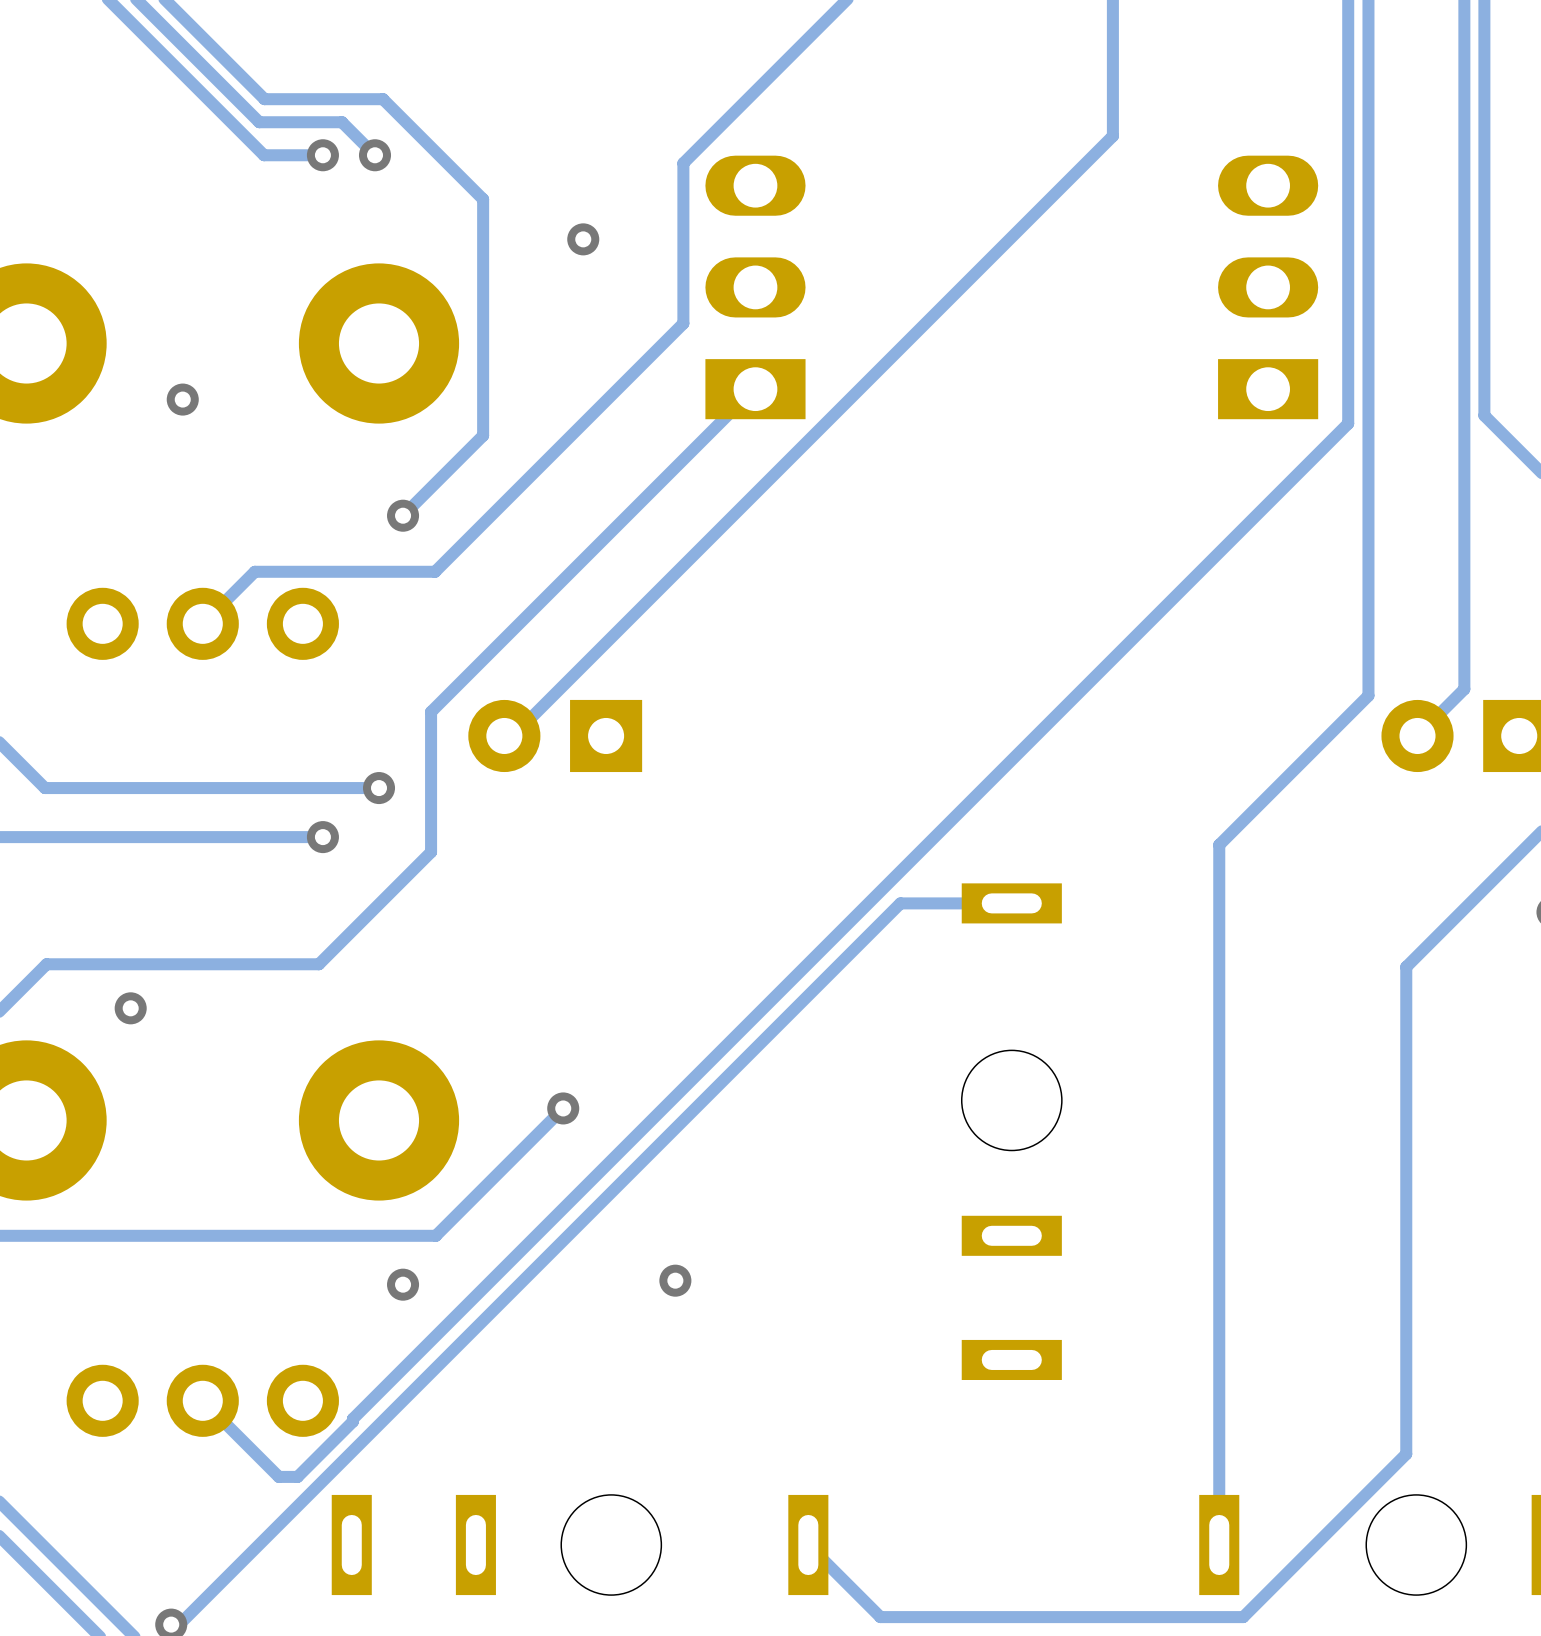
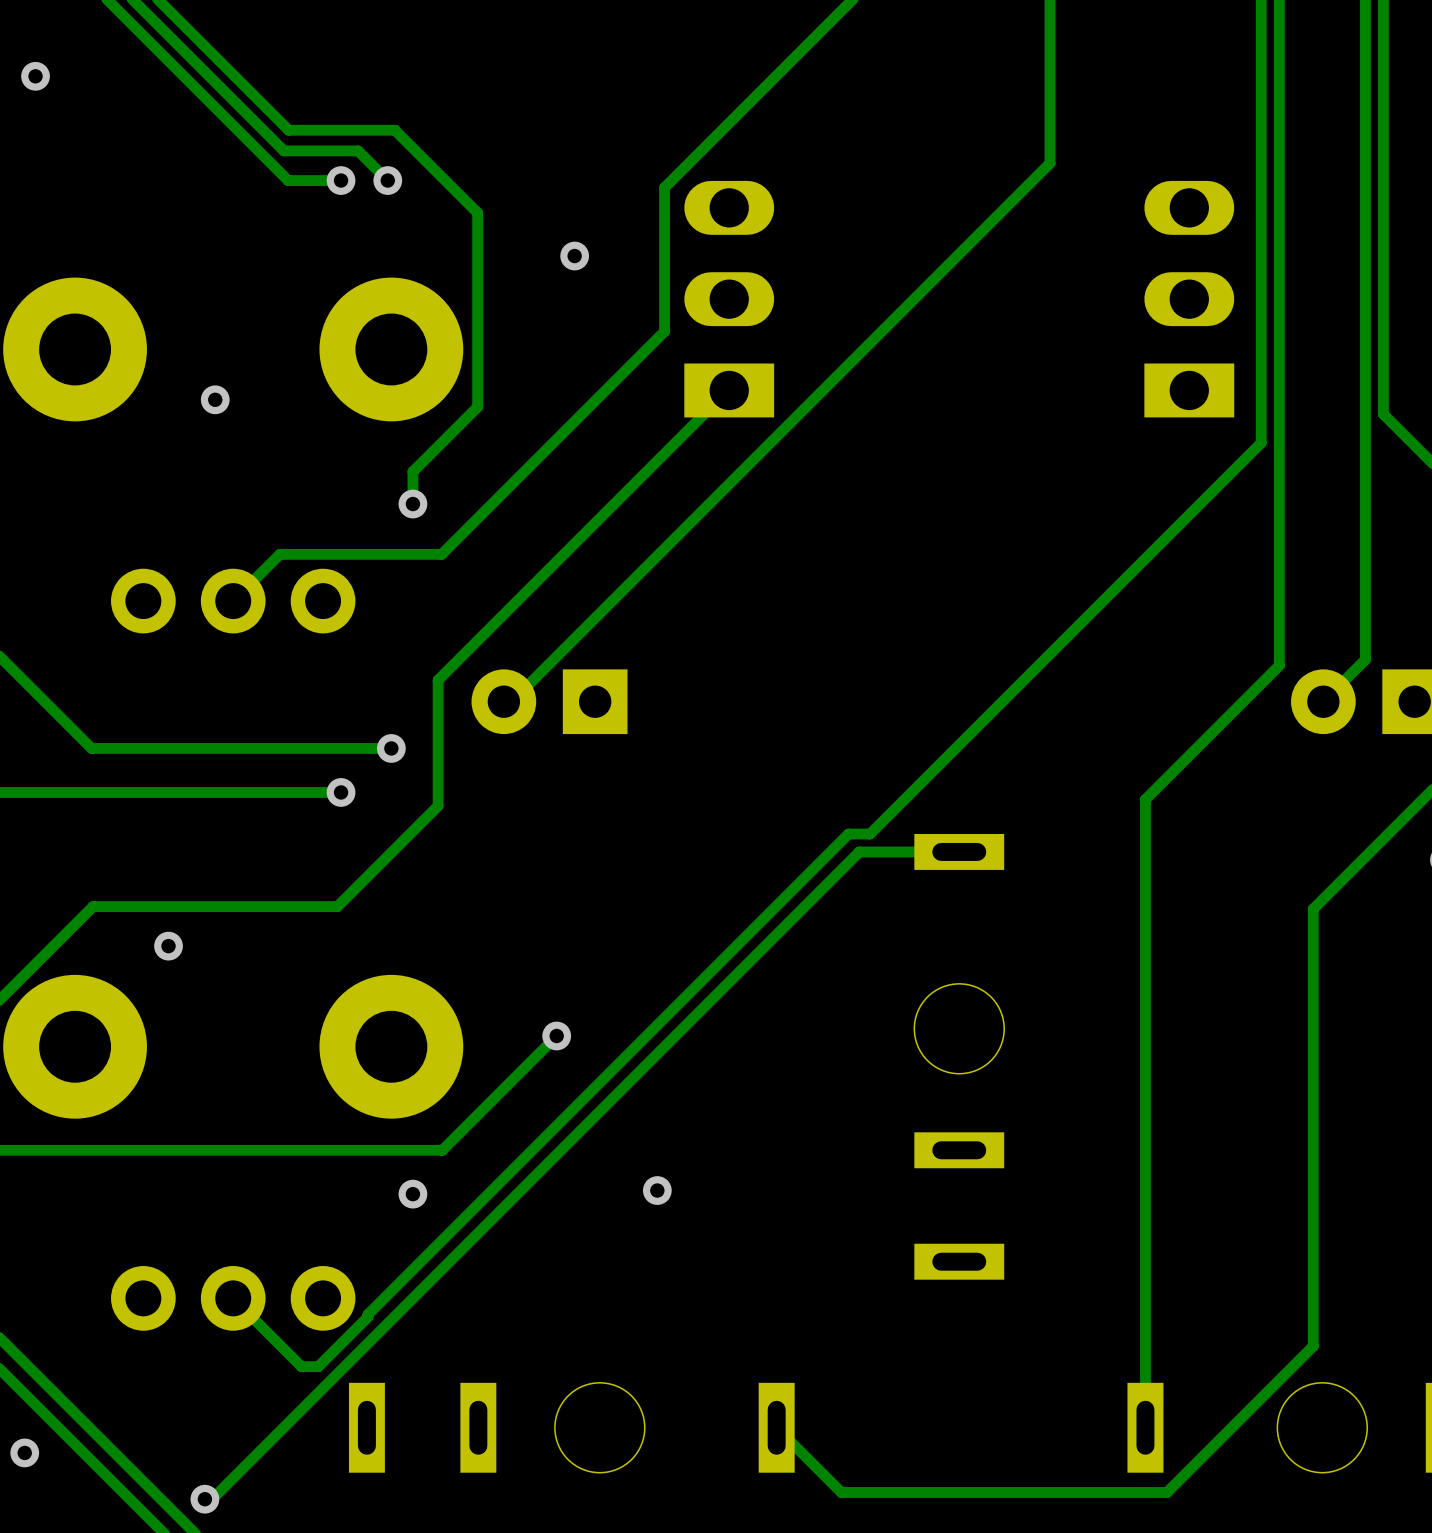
track: (475, 191) (483, 199) (483, 435) (403, 515) -> (477, 212) (477, 406) (412, 471) (412, 504)
track: (1348, 423) (888, 883) -> (1261, 421) (1261, 442) (870, 834) (848, 834)

